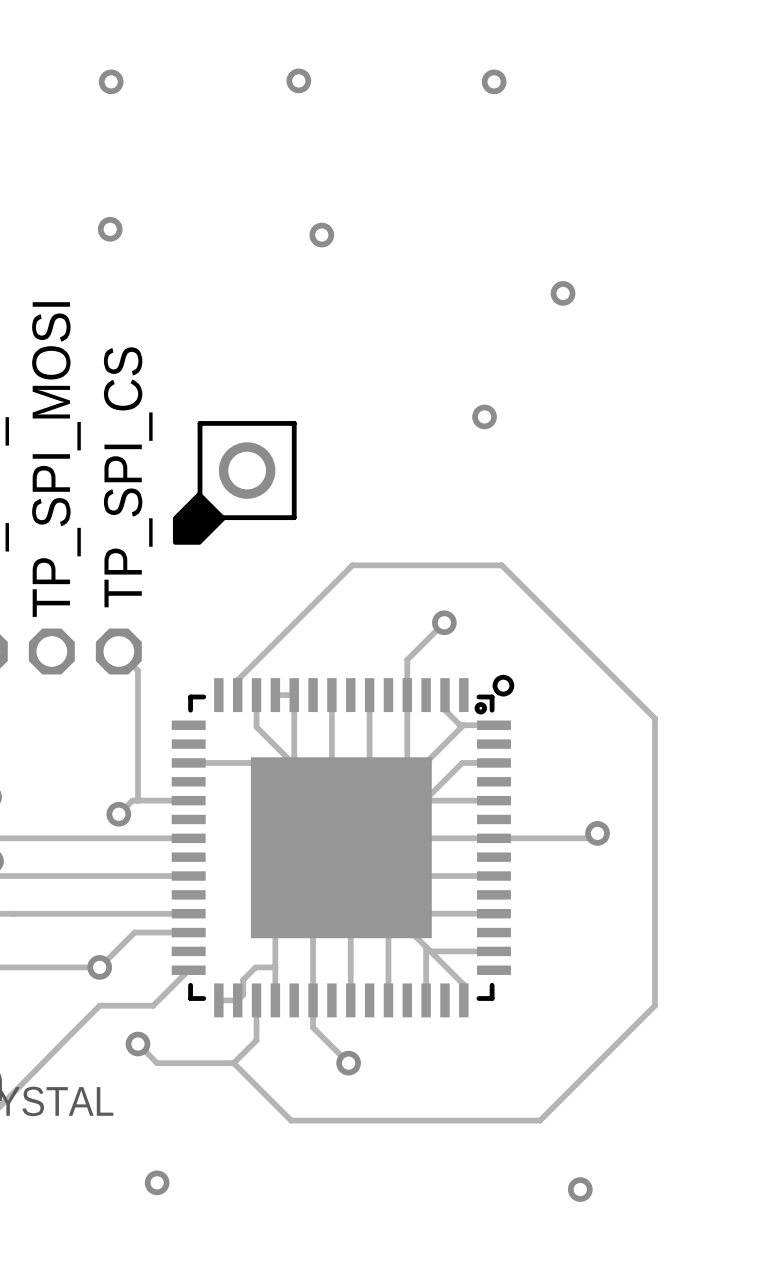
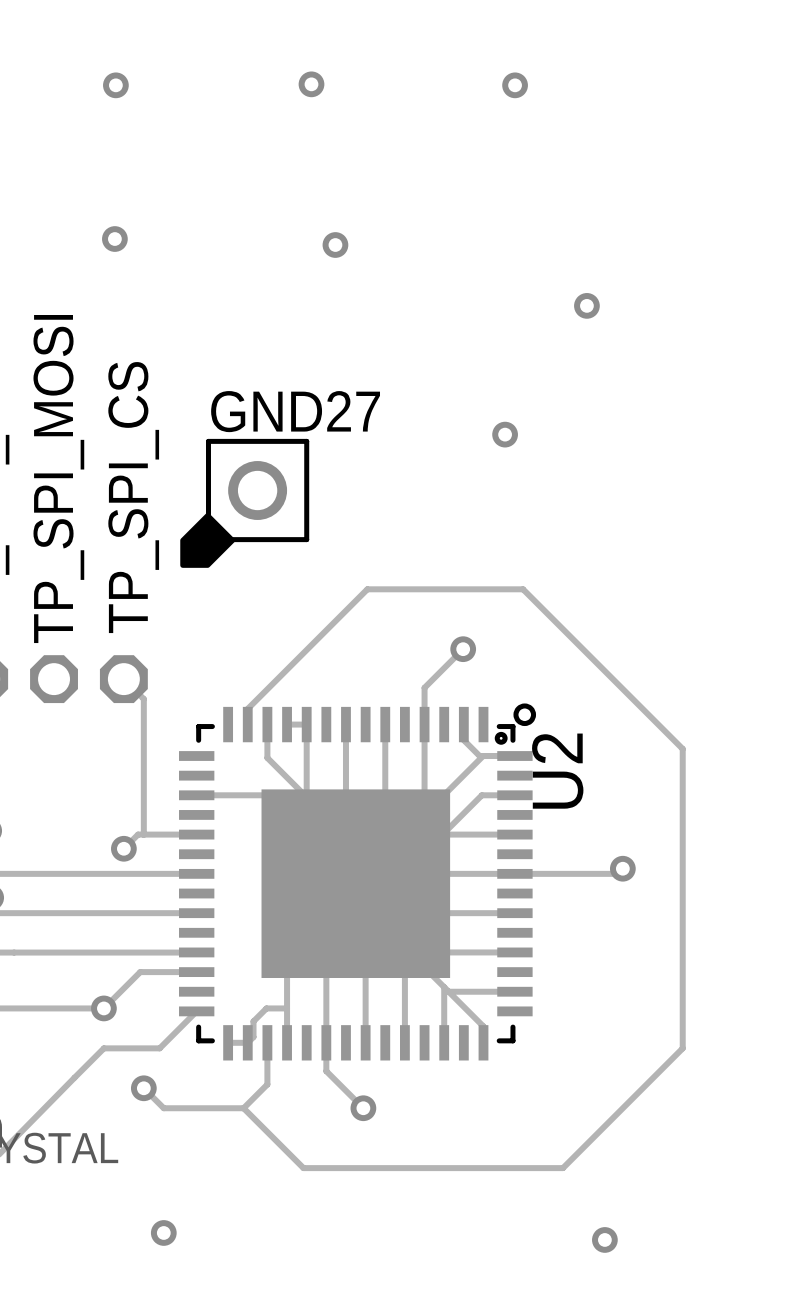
GND27 name: none -> GND27 (295, 411)
U2 name: none -> U2 (557, 771)

